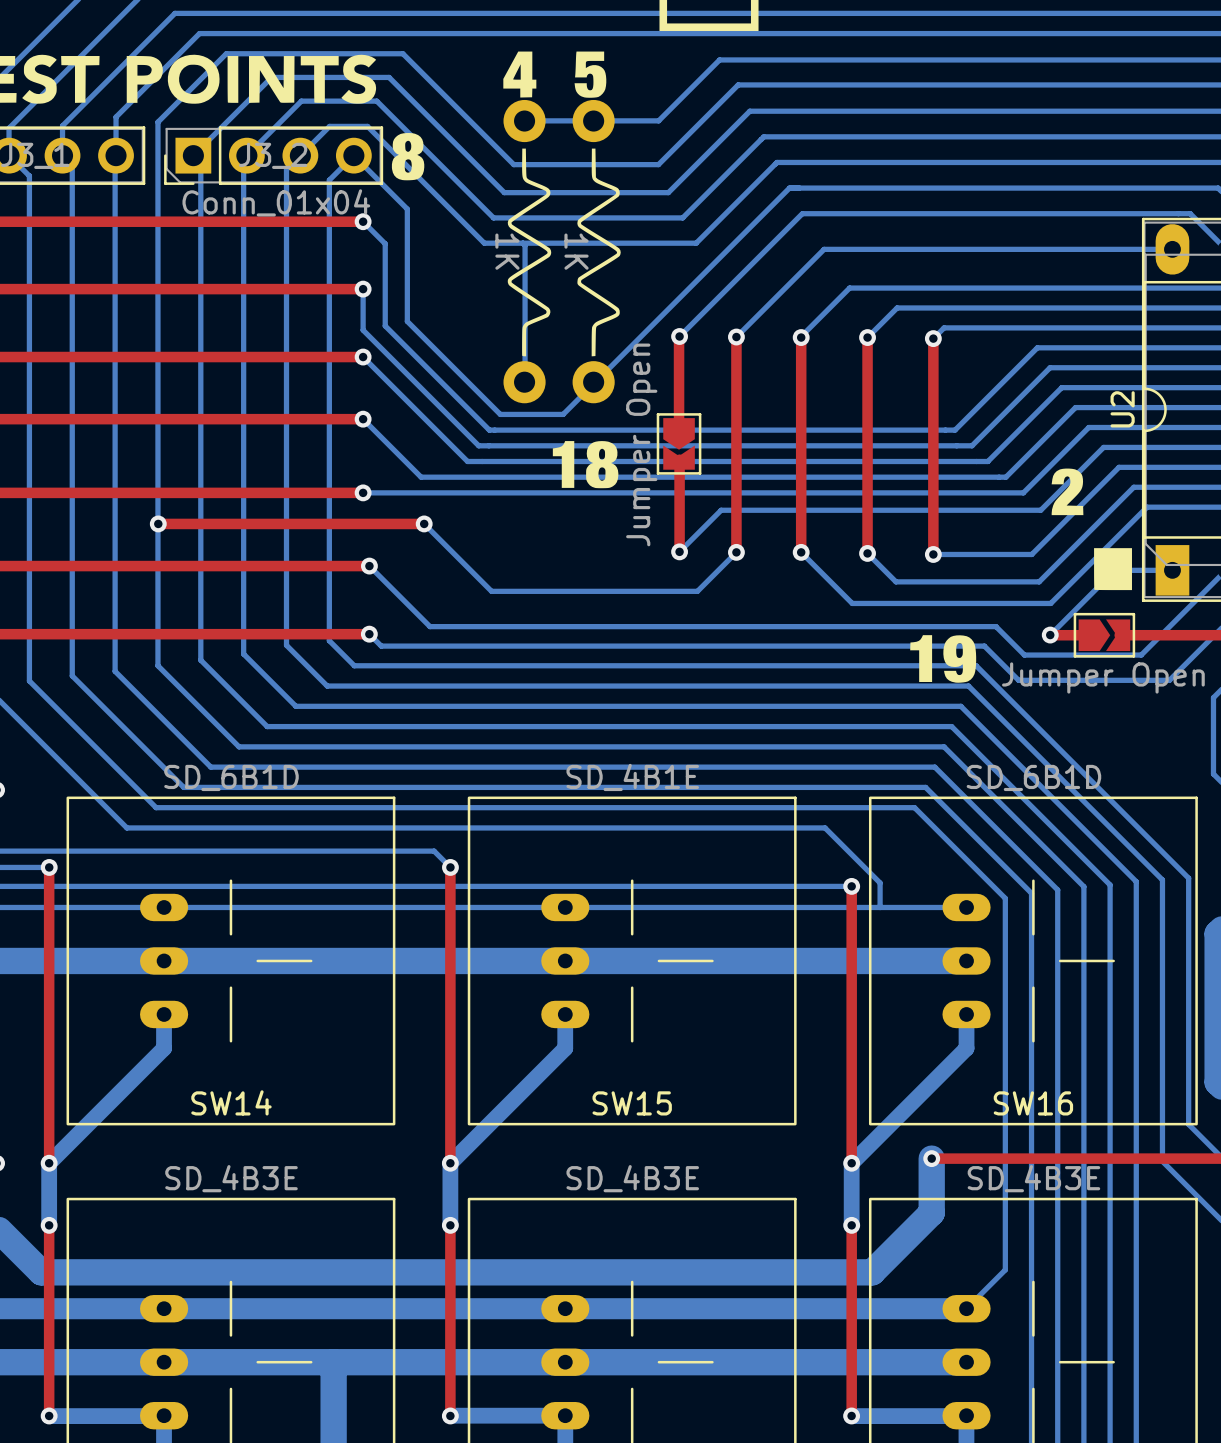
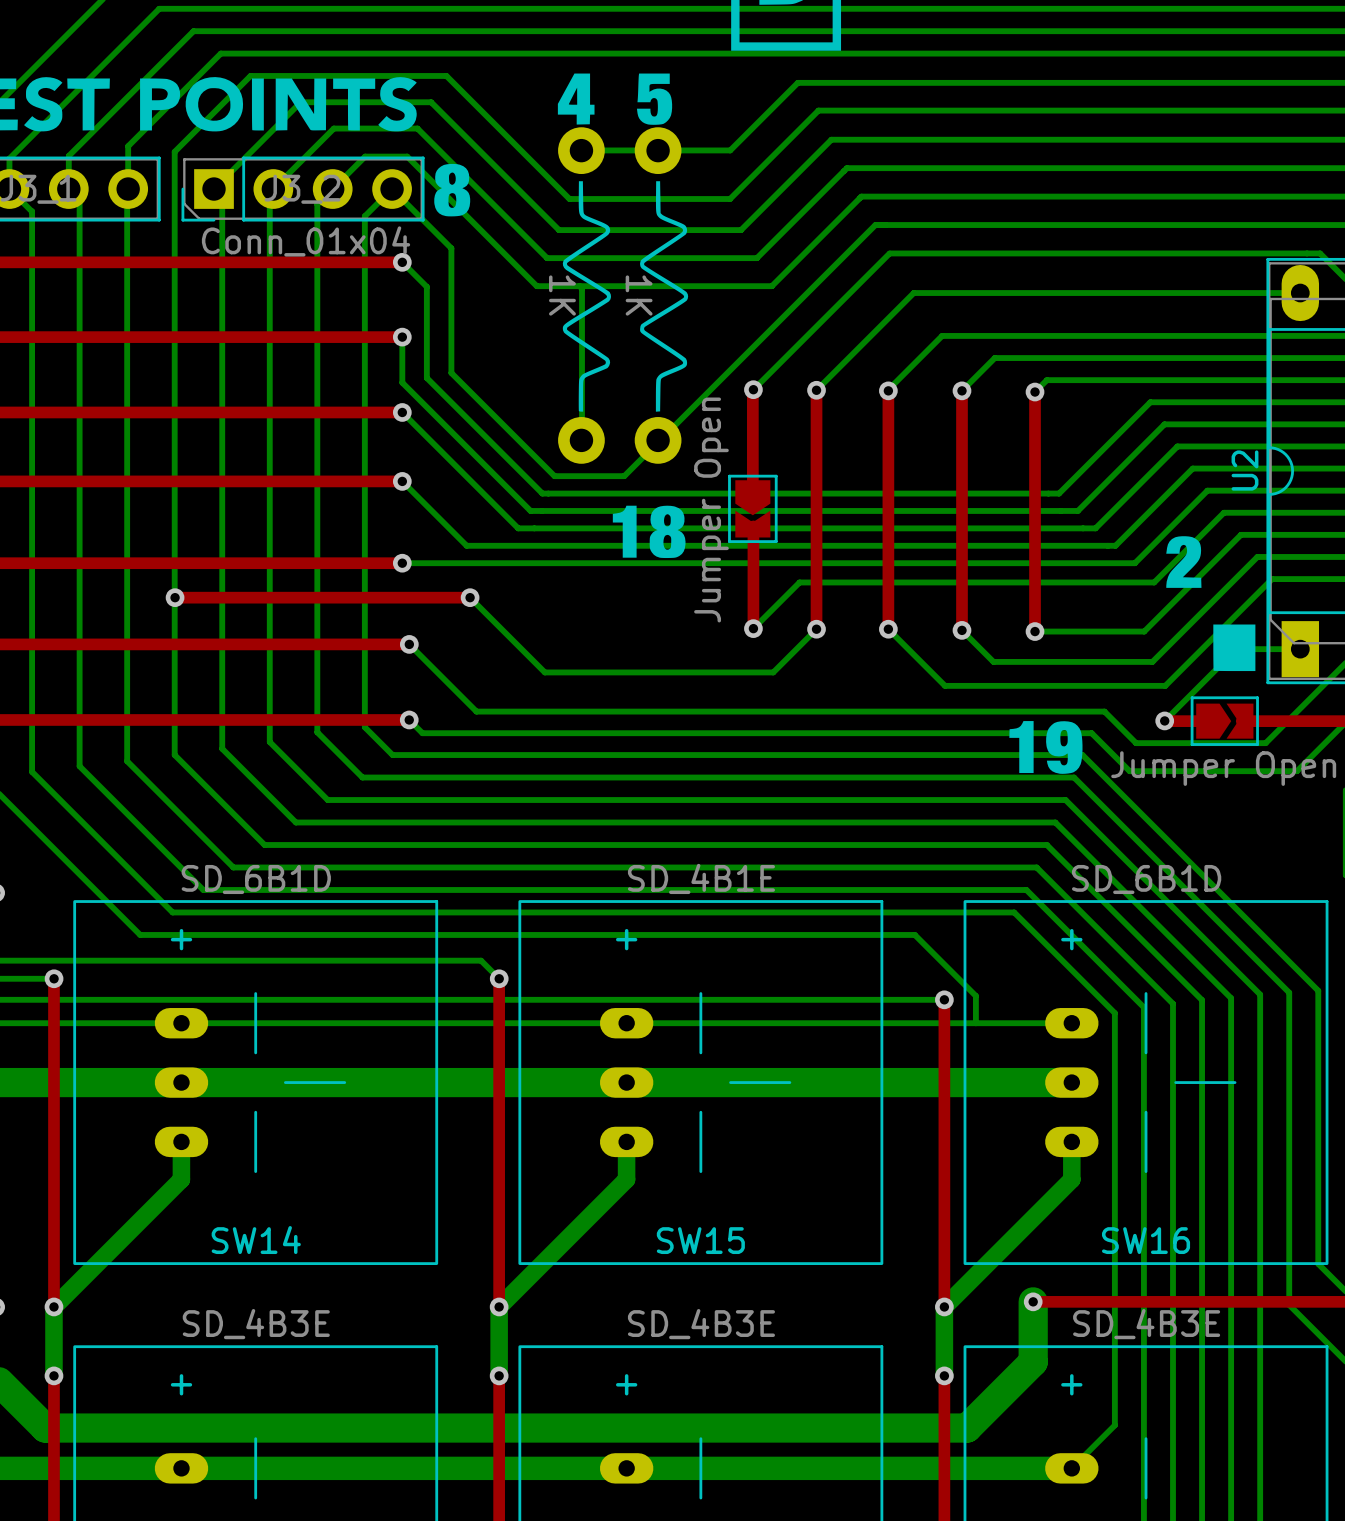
SW14 text: none -> + (181, 939)
SW15 text: none -> + (626, 939)
SW16 text: none -> + (1071, 939)
part text: none -> + (181, 1384)
part text: none -> + (626, 1384)
part text: none -> + (1071, 1384)

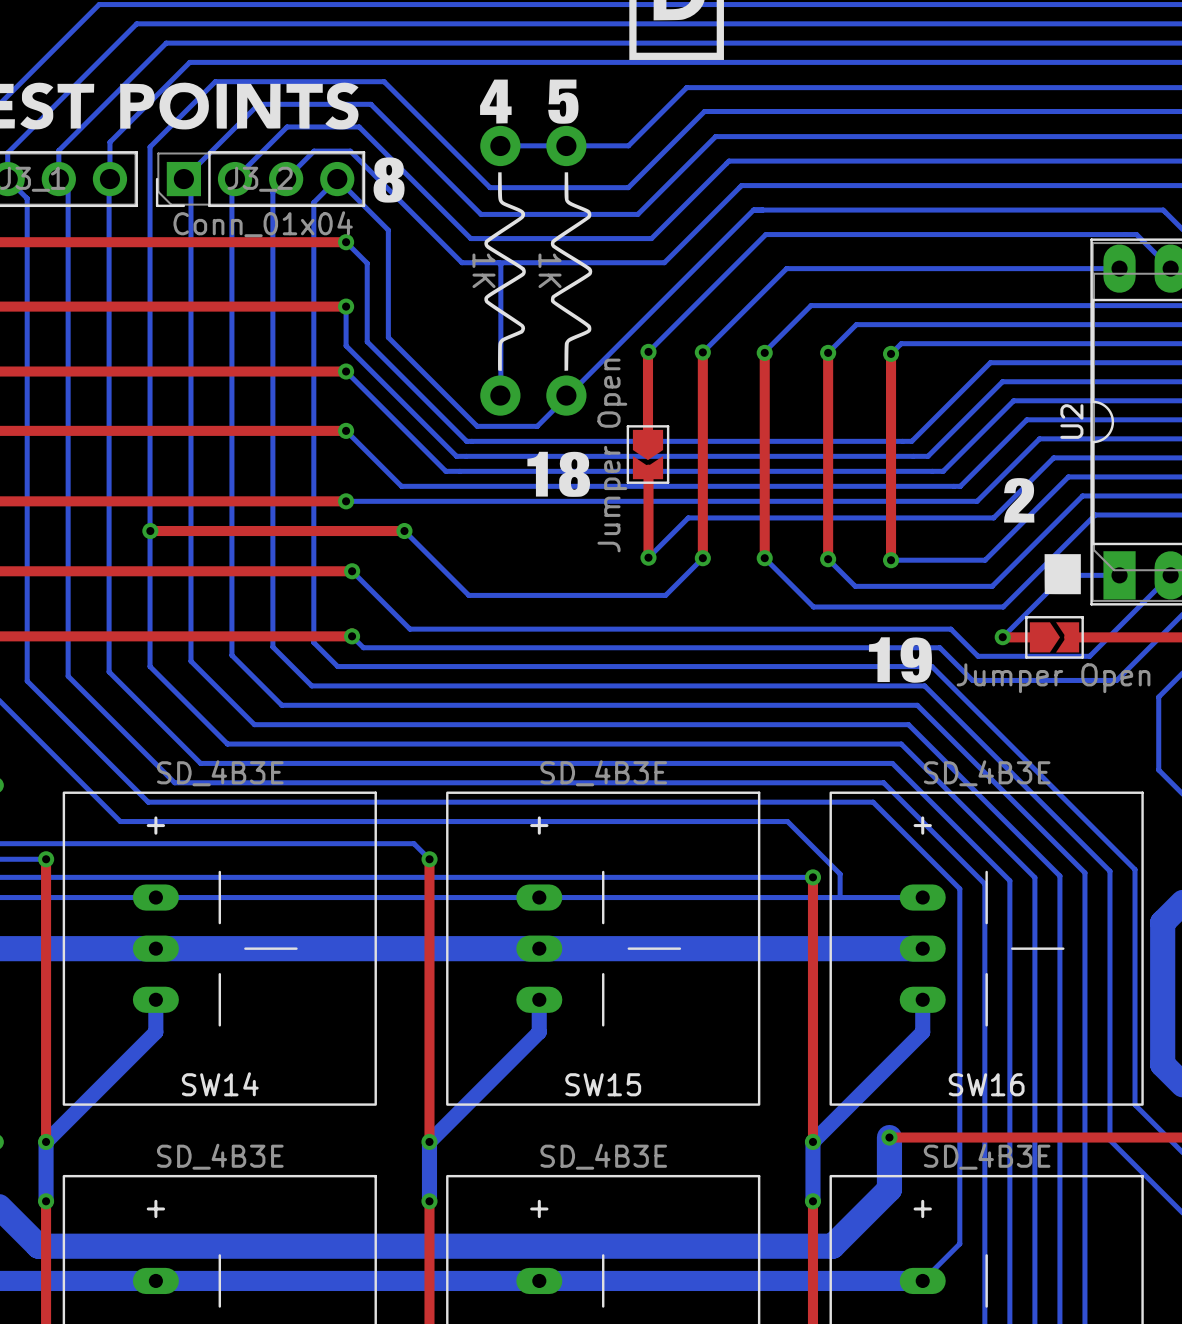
SW15 value: SD_4B1E (701, 878) -> SD_4B3E (603, 773)
SW14 value: SD_6B1D (256, 879) -> SD_4B3E (220, 773)
SW16 value: SD_6B1D (1146, 879) -> SD_4B3E (987, 773)

